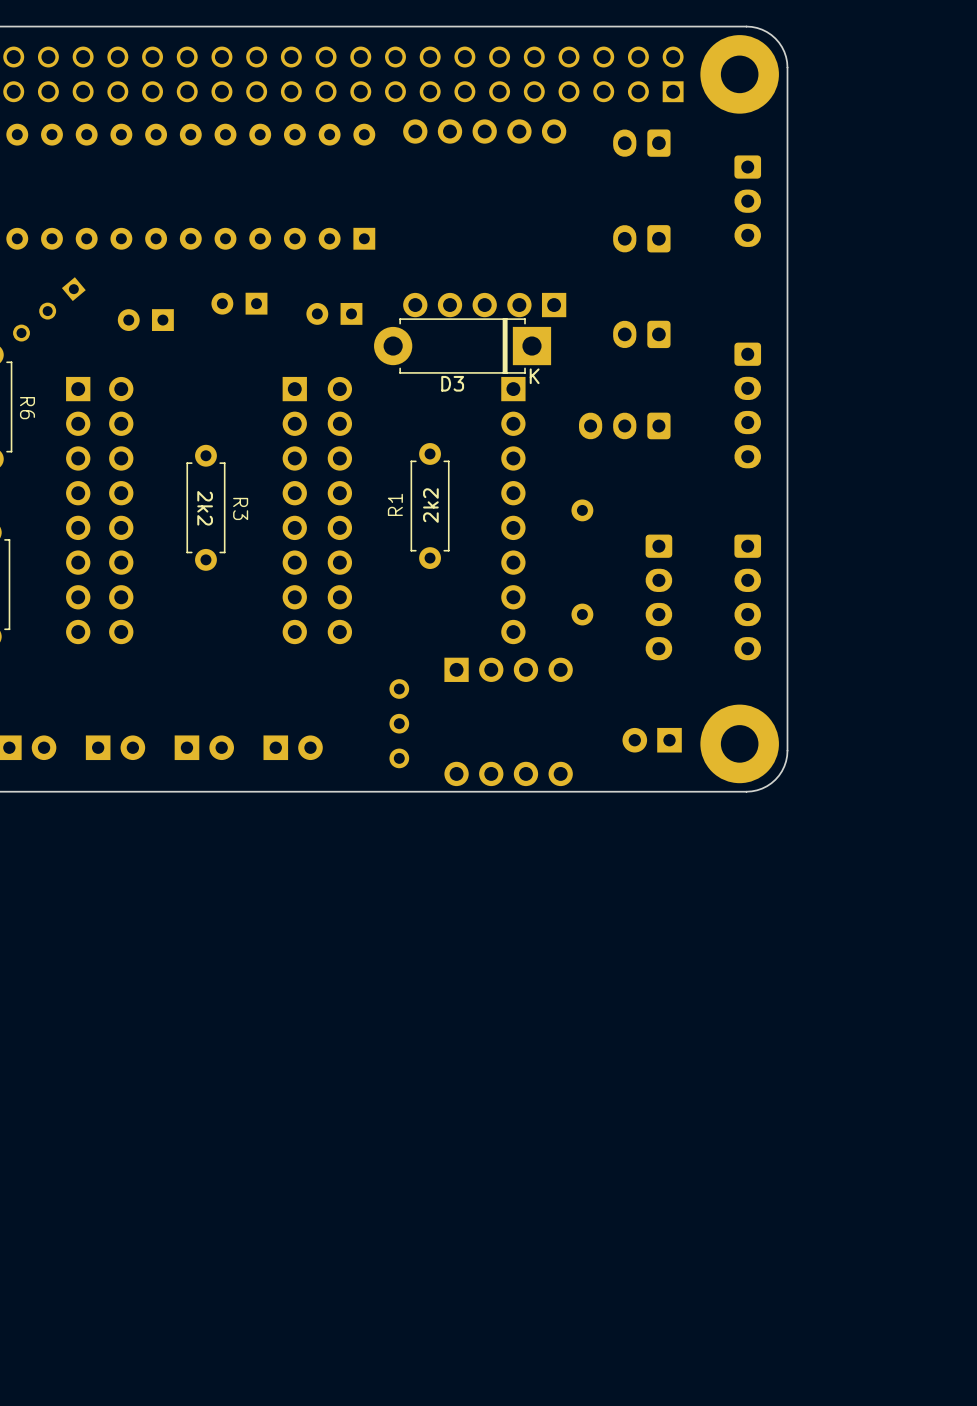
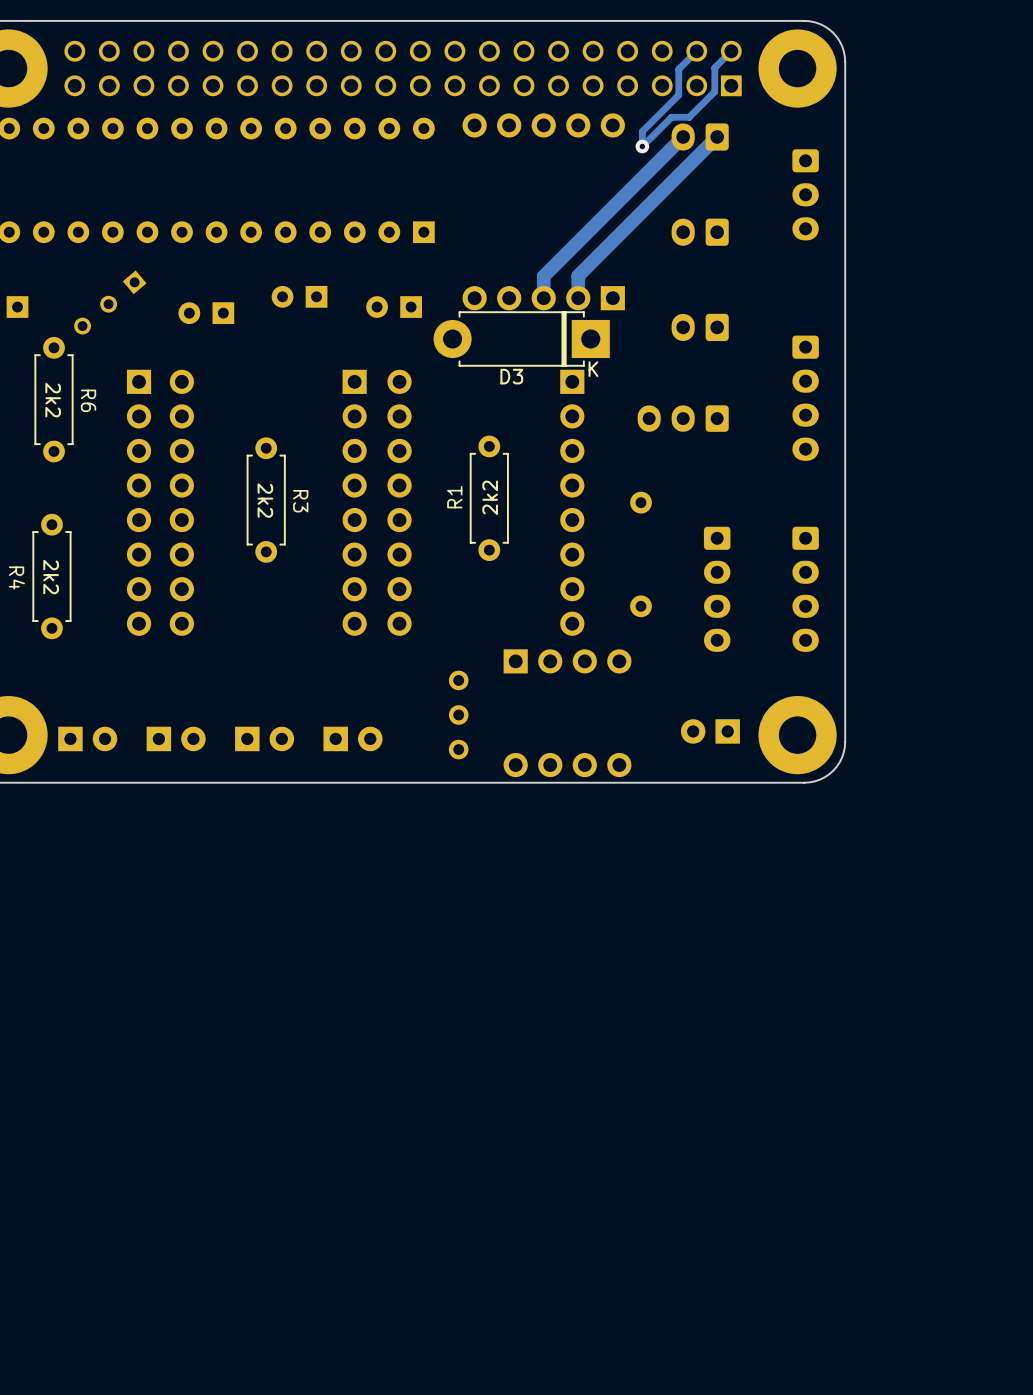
track: none -> (731, 51) (714, 67) (714, 91) (689, 117) (671, 117) (642, 146) (642, 131) (678, 95) (678, 69) (696, 51)
track: none -> (683, 136) (543, 276) (543, 298)
track: none -> (717, 136) (578, 275) (578, 298)
via: none -> (642, 146)

